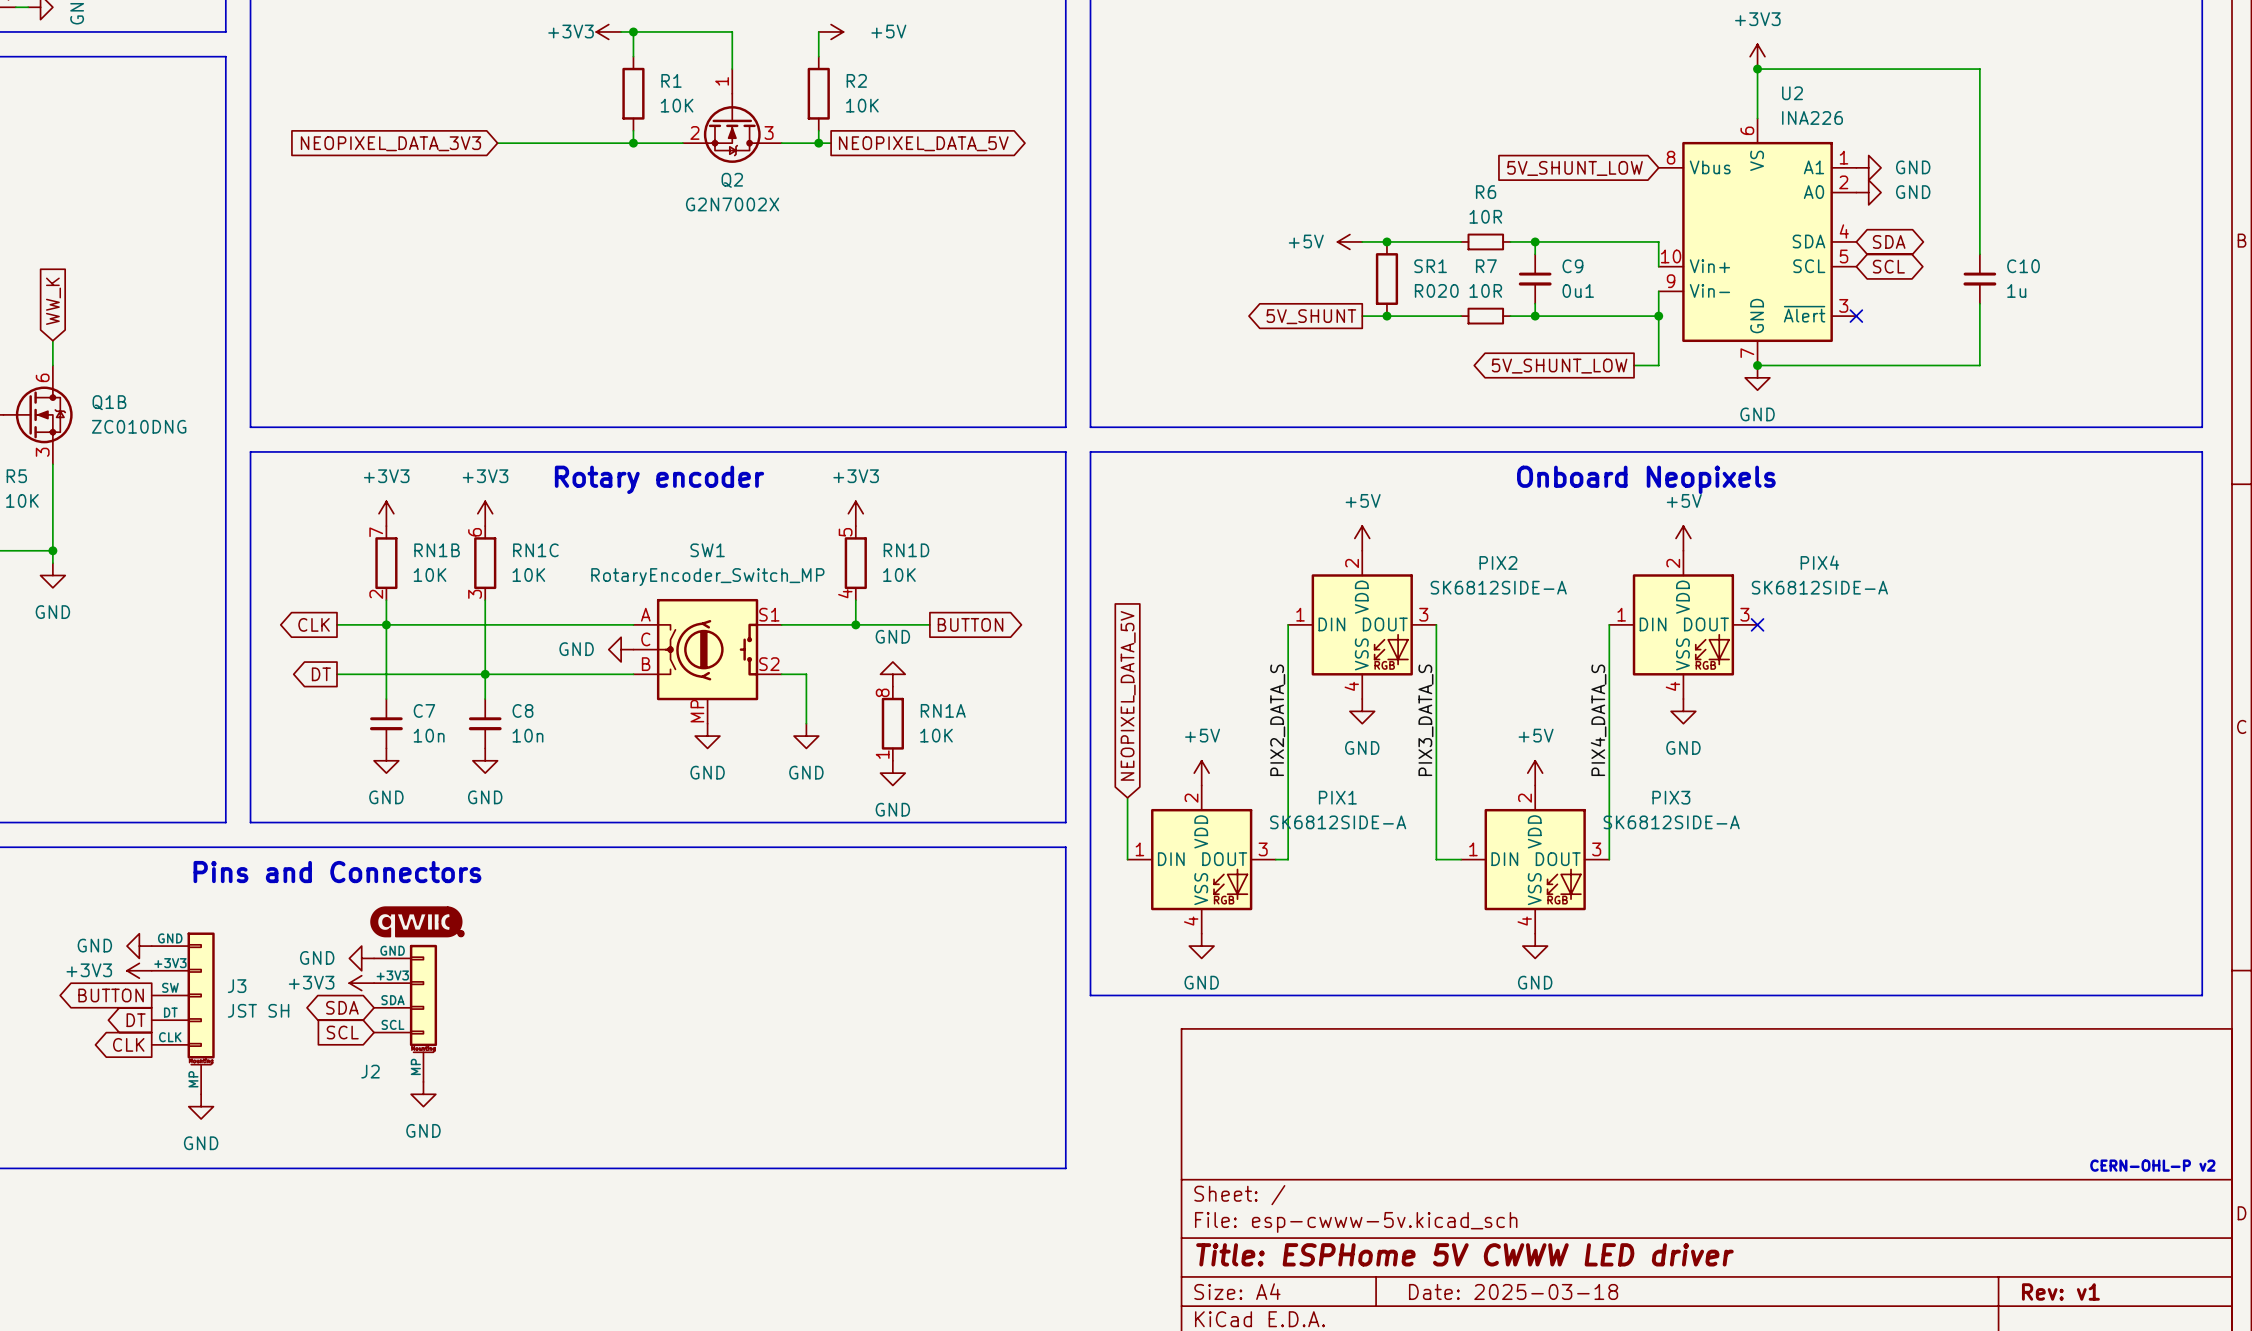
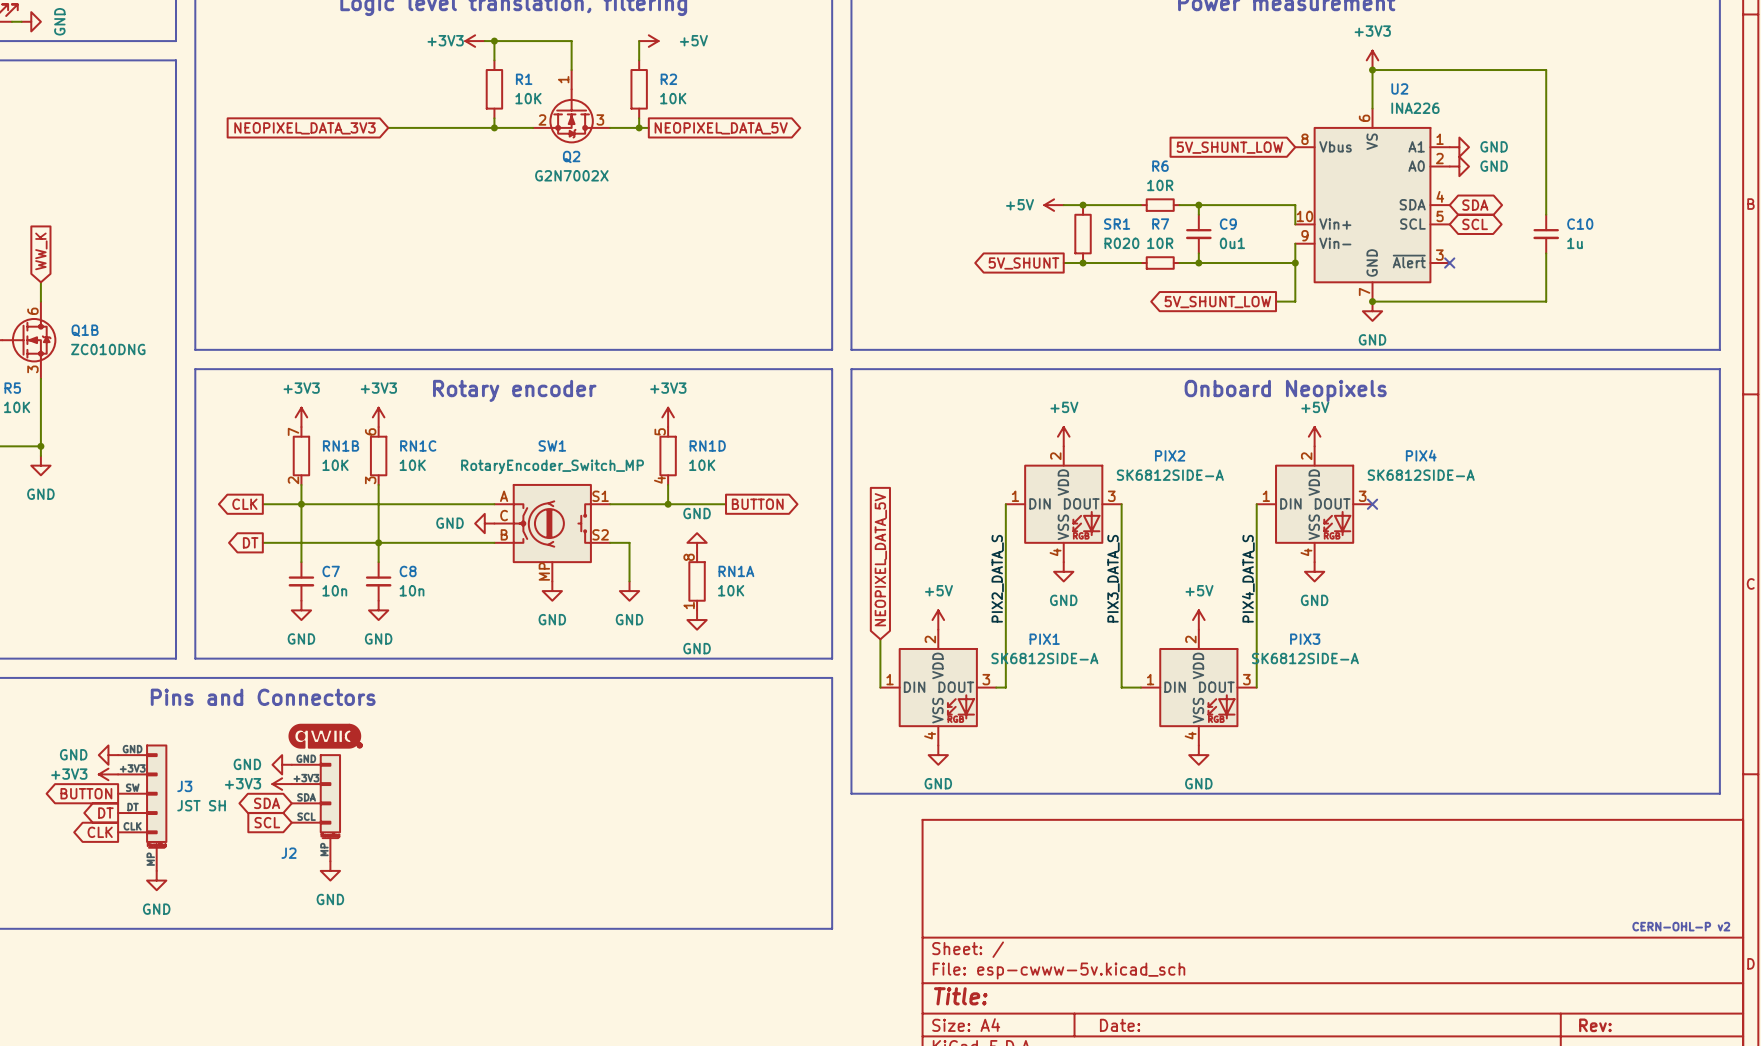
title block: Title: ESPHome 5V CWWW LED driver (1464, 1254) -> Title: (960, 996)
title block: Date: 2025-03-18 (1513, 1291) -> Date: (1120, 1025)
title block: Rev: v1 (2060, 1291) -> Rev: (1595, 1025)

